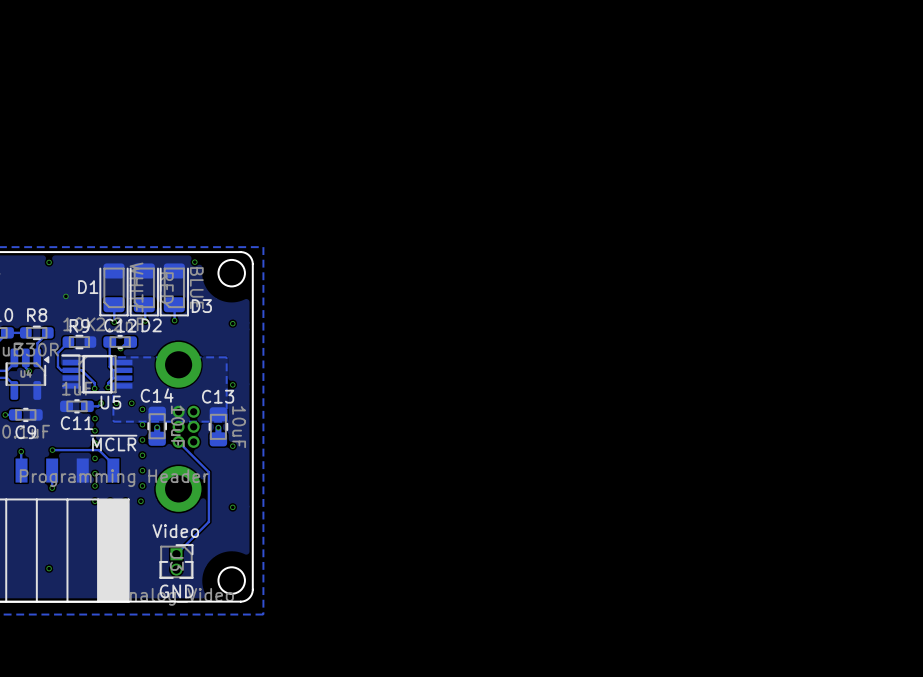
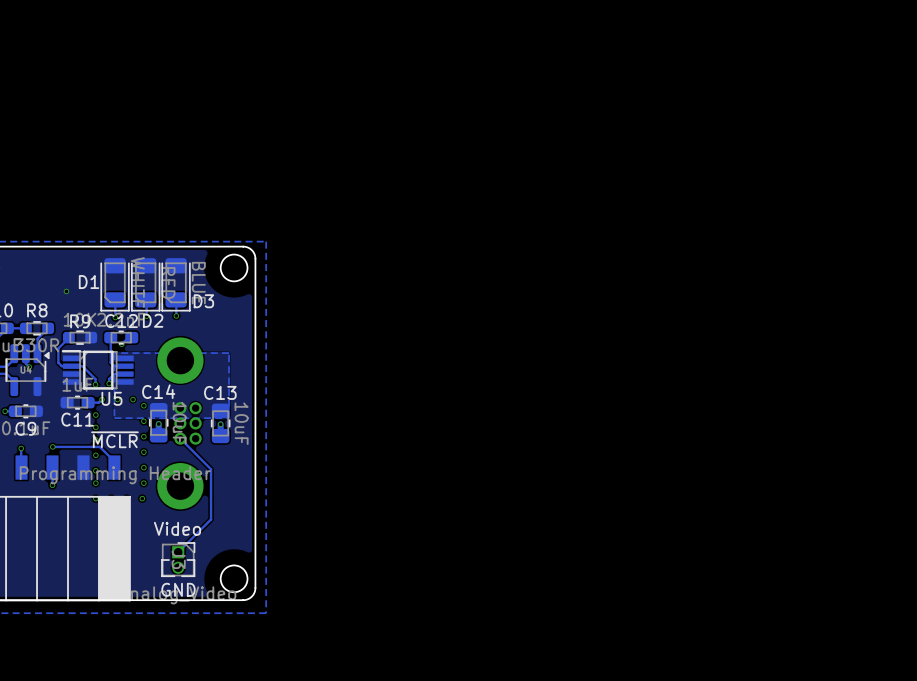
via: (49, 262) -> none
via: (194, 262) -> none
via: (232, 323) -> none
via: (232, 384) -> none
via: (232, 446) -> none
via: (232, 507) -> none
via: (49, 568) -> none

